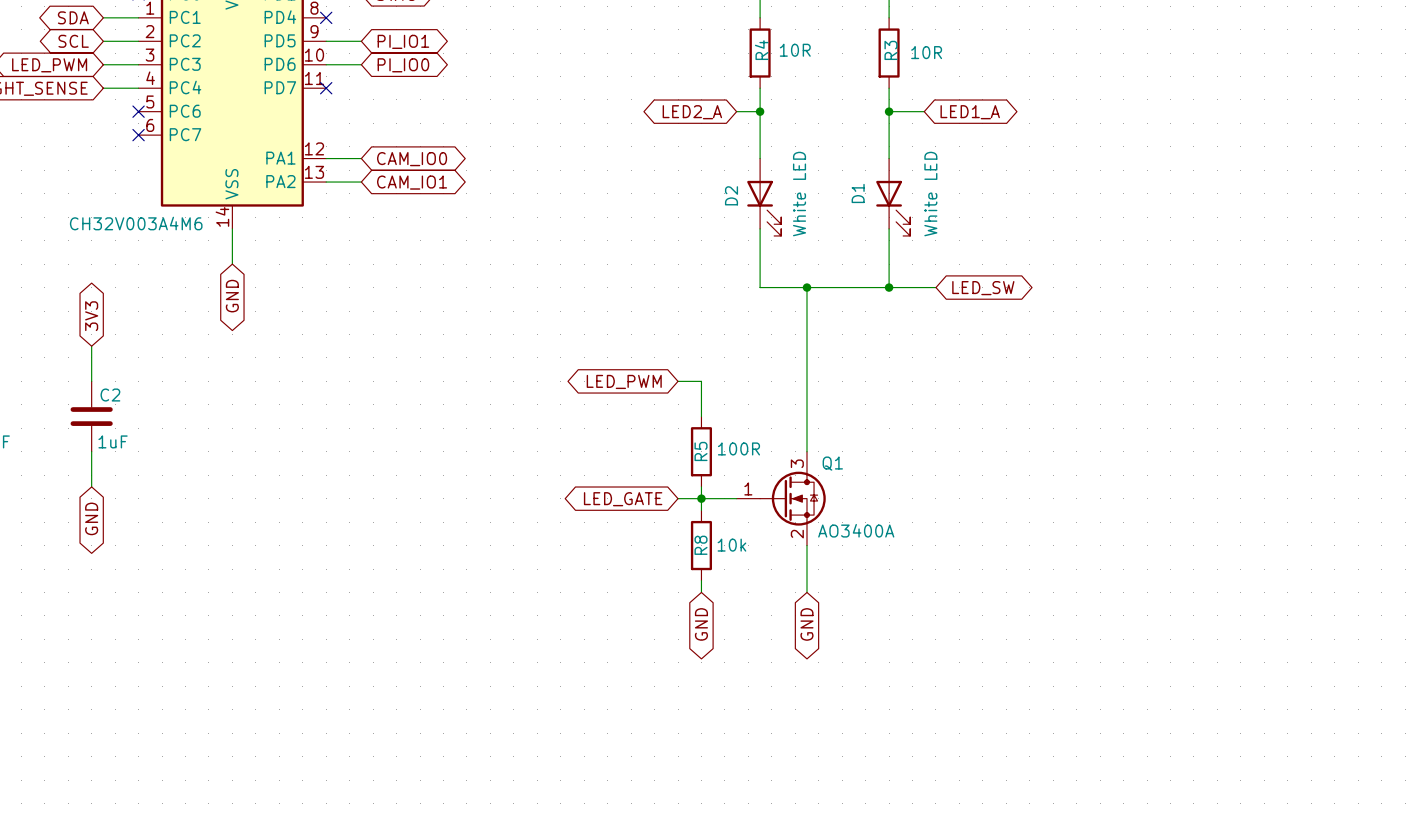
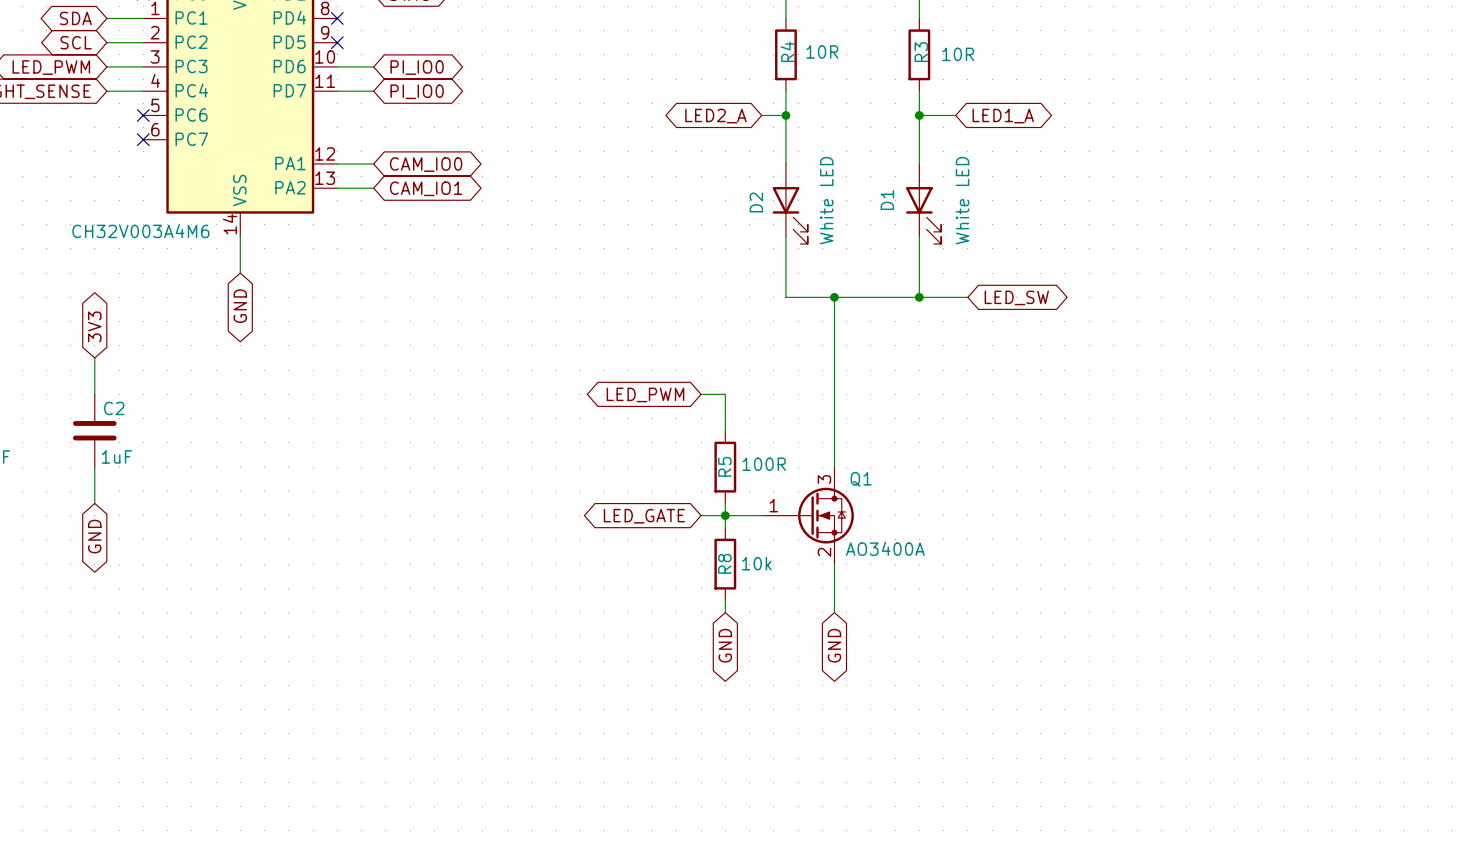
wire: (326, 41) (361, 41) -> (337, 91) (373, 91)
global label: PI_IO1 (403, 41) -> none
no-connect mark position: (326, 88) -> (337, 42)
global label: none -> PI_IO0 (417, 91)

